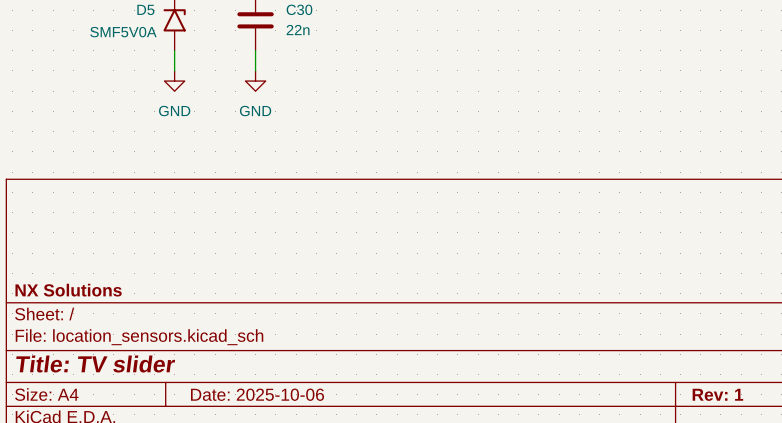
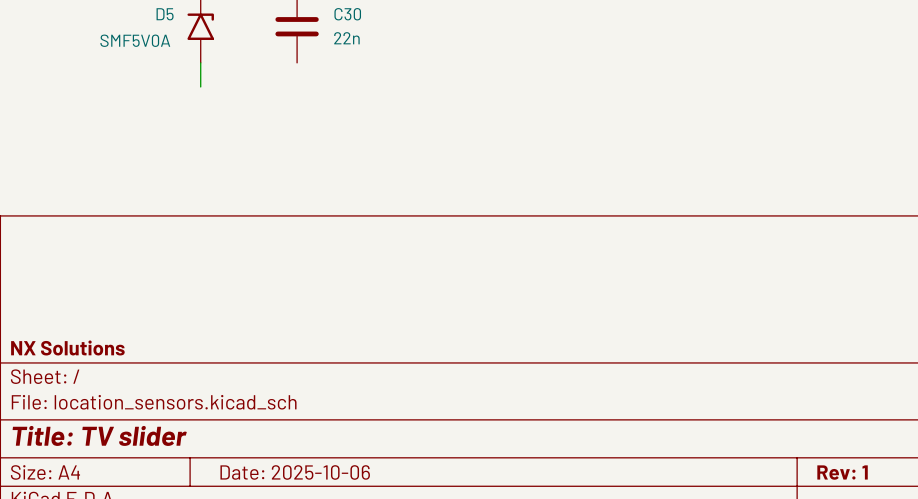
wire: (255, 50) (255, 70) -> none
power symbol: GND (174, 81) -> none
power symbol: GND (255, 81) -> none

